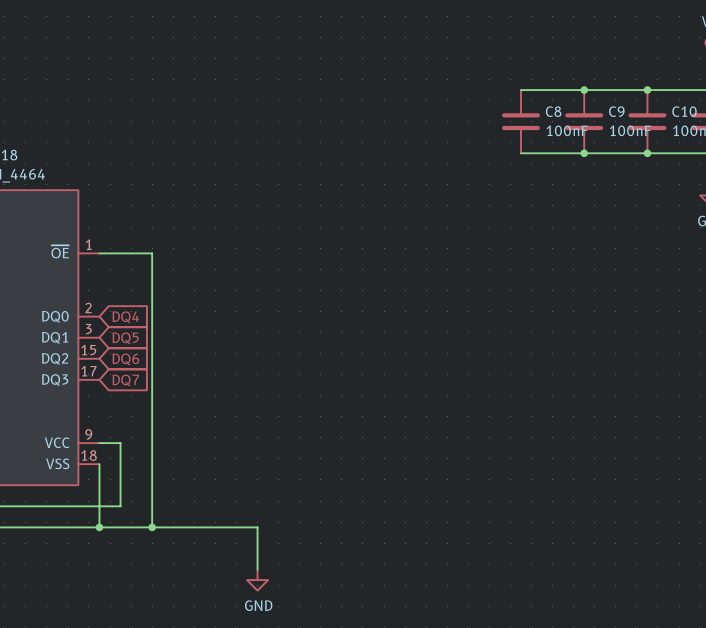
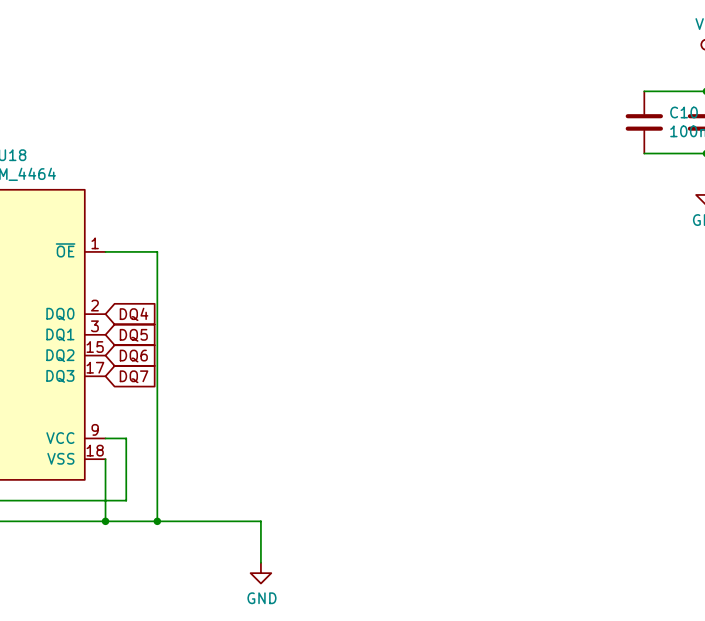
wire: (520, 90) (647, 90) -> none
junction: (584, 90) -> none
junction: (647, 90) -> none
C8: 100nF (520, 121) -> none
C9: 100nF (584, 121) -> none
wire: (520, 153) (647, 153) -> none
junction: (584, 153) -> none
junction: (647, 153) -> none

